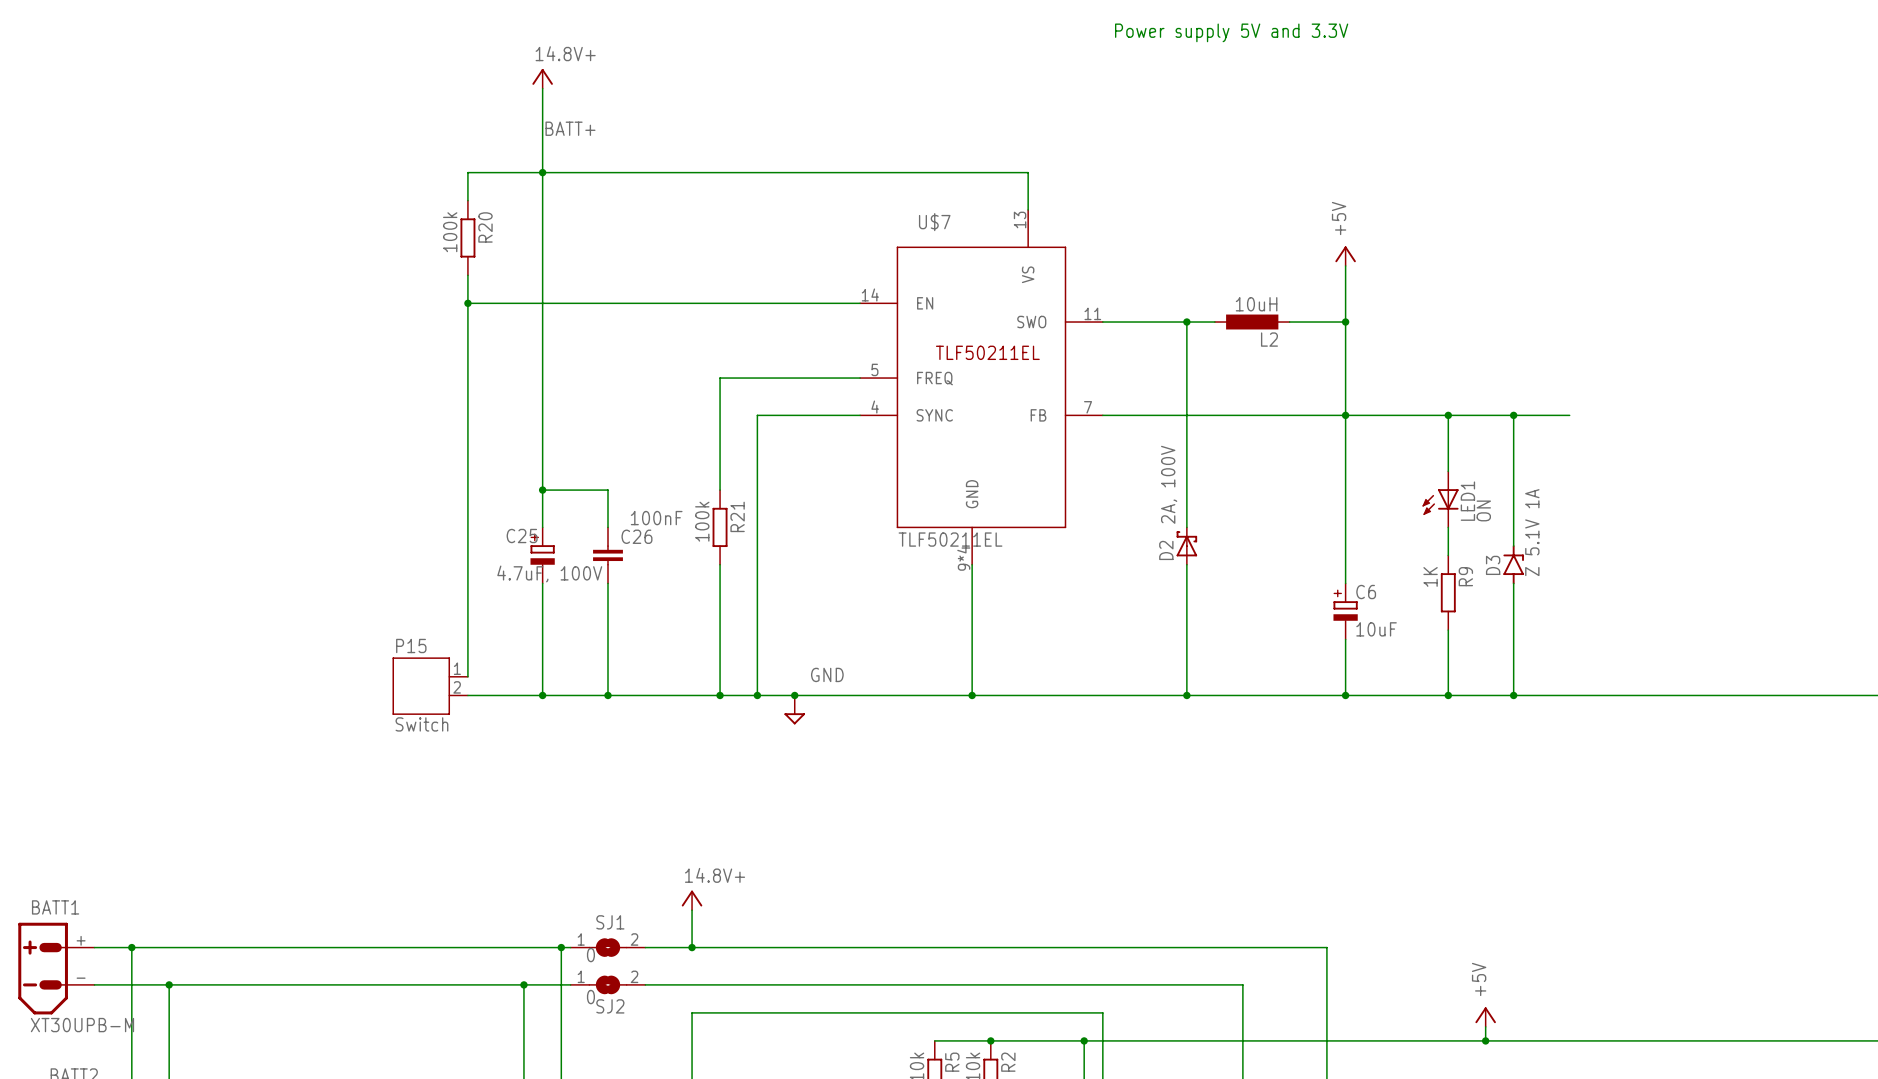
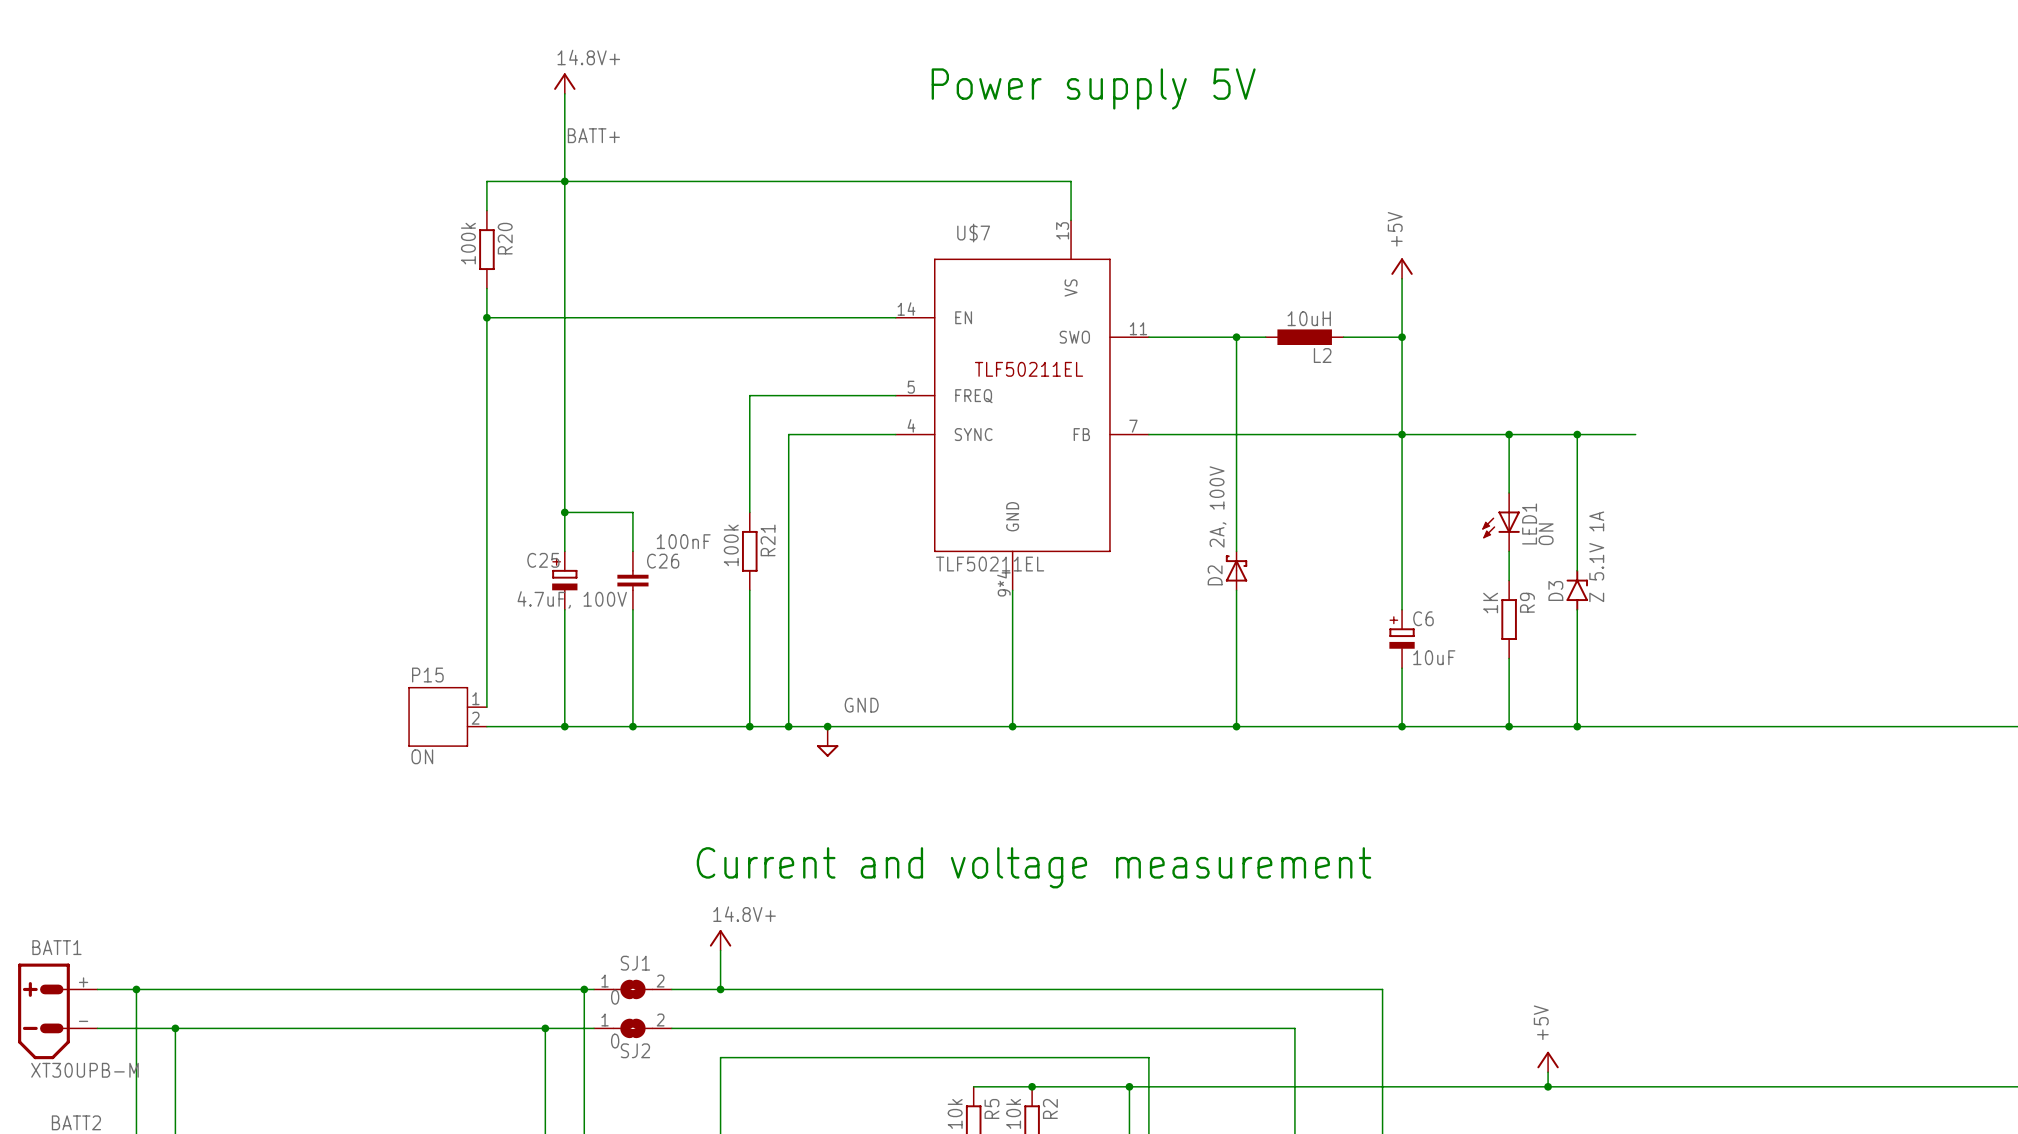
text: Power supply 5V and 3.3V (1231, 32) -> none
text: none -> Power supply 5V (1093, 88)
P15 value: Switch (421, 724) -> ON (422, 756)
text: none -> Current and voltage measurement (1033, 867)

